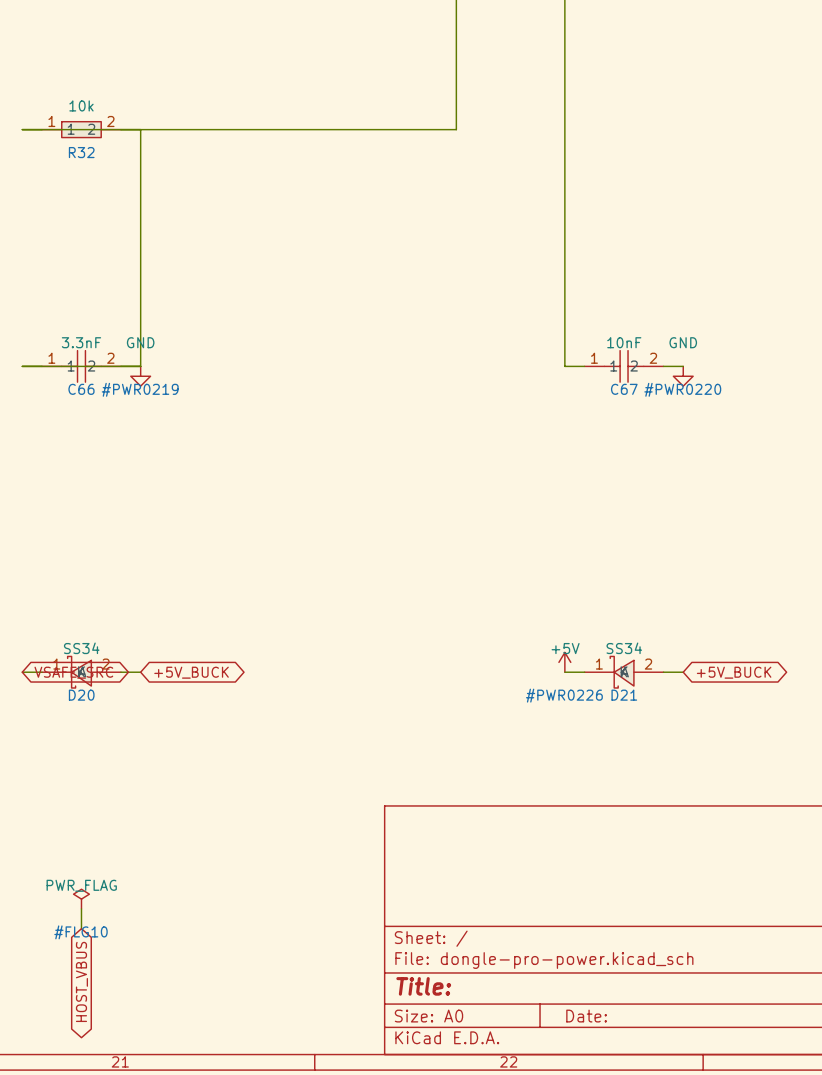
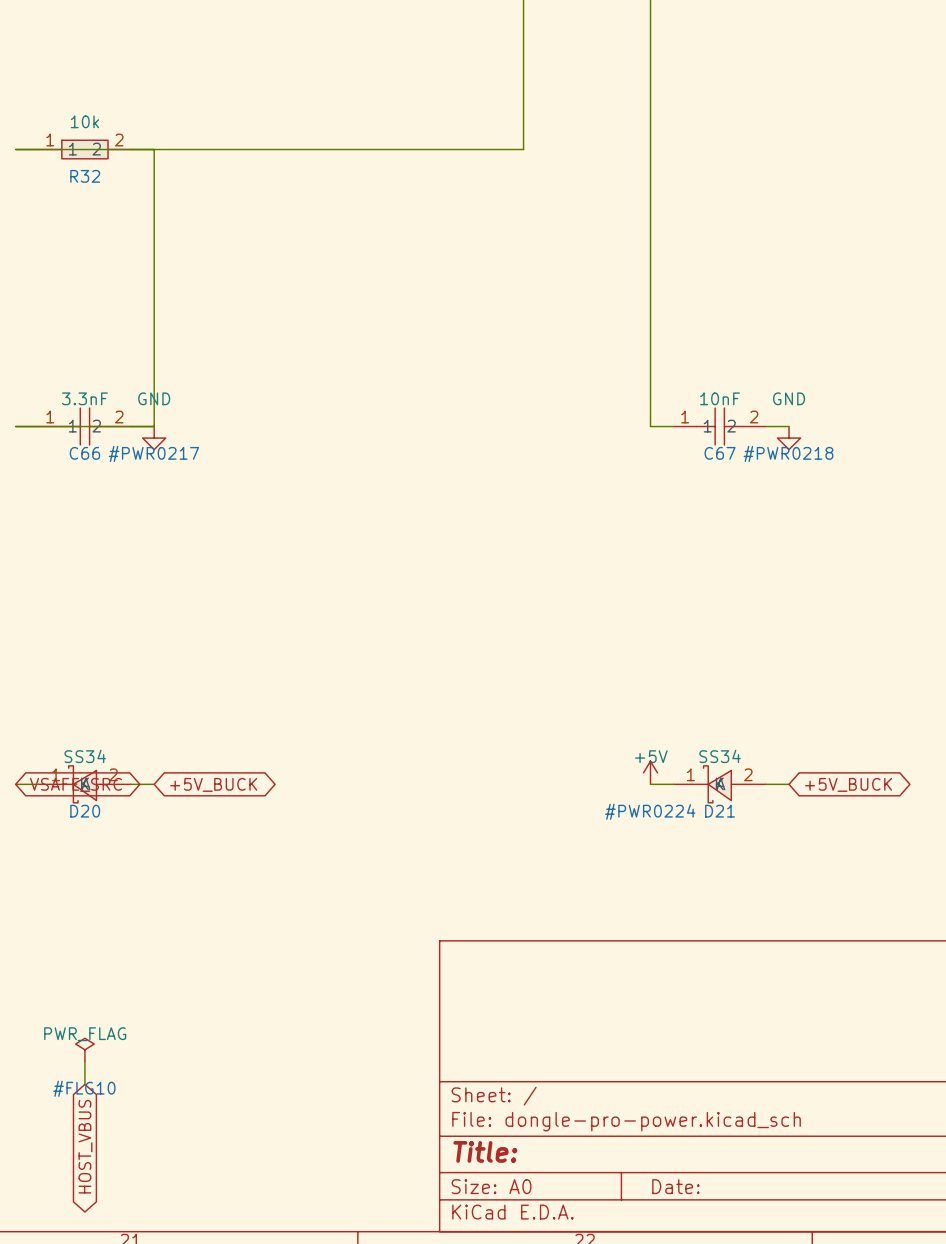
#PWR0219 name: #PWR0219 (140, 389) -> #PWR0217 (153, 453)
#PWR0220 name: #PWR0220 (682, 389) -> #PWR0218 (788, 453)
#PWR0226 name: #PWR0226 (564, 695) -> #PWR0224 (650, 811)

